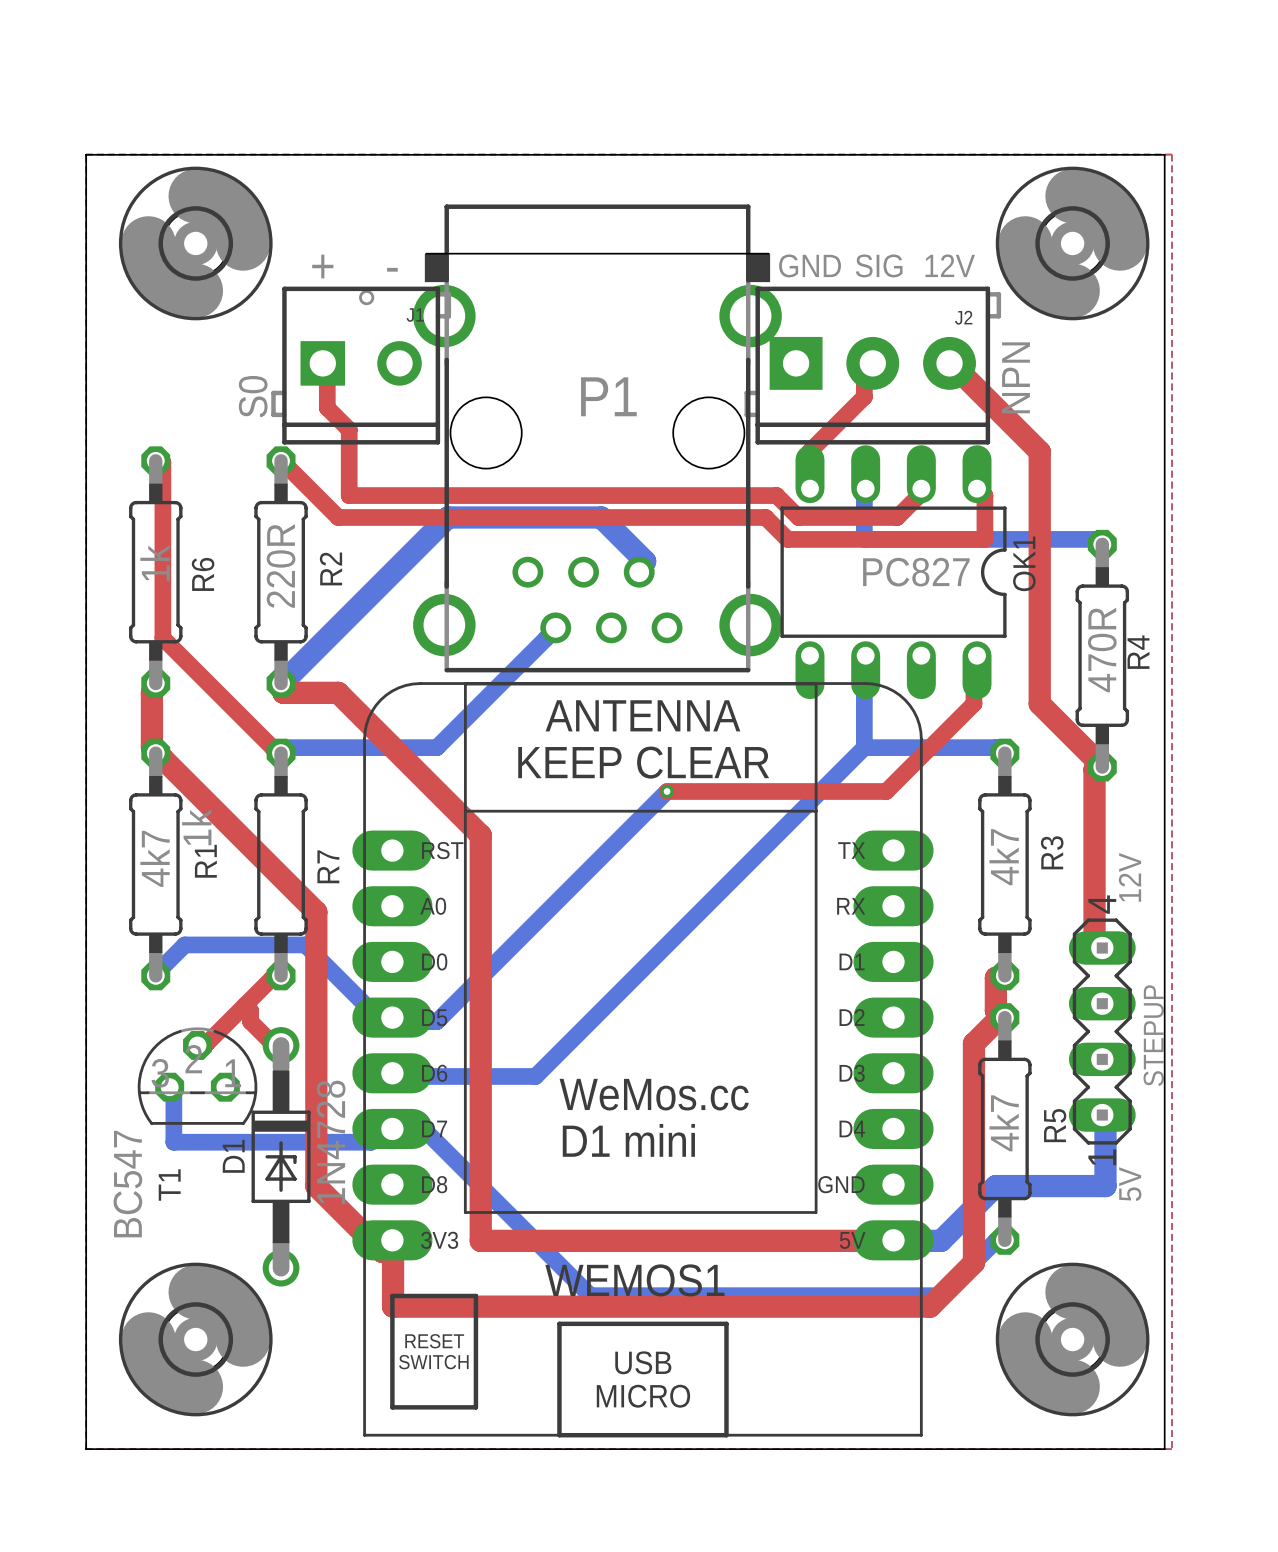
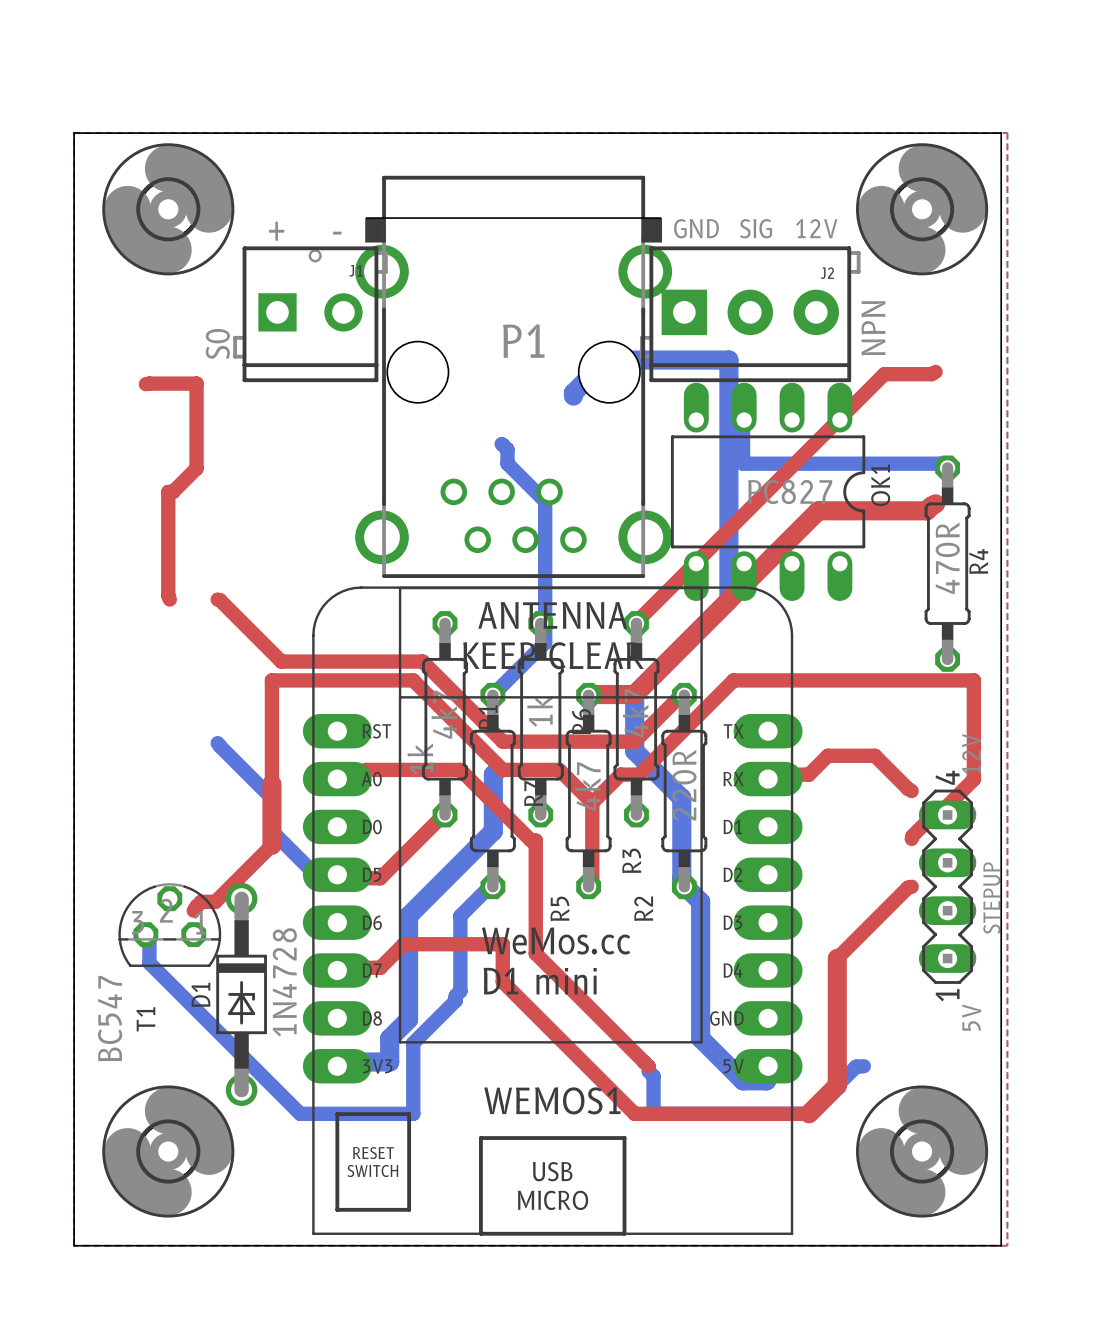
top track: (322, 363) (327, 364) (327, 407) (349, 429) (349, 495) (776, 495) (798, 517) (897, 517) (919, 495) (921, 488) -> none
top track: (872, 363) (864, 364) (864, 396) (809, 451) (809, 488) -> none
top track: (949, 363) (1039, 451) (1039, 703) (1102, 767) (1094, 769) (1094, 944) (1102, 948) -> none
top track: none -> (935, 371) (931, 374) (884, 374) (636, 623)
top track: none -> (145, 384) (196, 383) (196, 468) (173, 491) (168, 491) (169, 599)
top track: (155, 460) (162, 462) (162, 638) (272, 747) (281, 753) -> none
top track: (281, 460) (338, 517) (765, 517) (787, 539) (984, 539) (984, 495) (977, 488) -> none
bottom track: none -> (501, 444) (507, 449) (507, 463) (545, 501) (545, 619) (540, 623) (545, 623) (545, 642) (492, 695)
R2 name position: R2 (330, 568) -> R2 (643, 908)
R6 position: (155, 572) -> (540, 719)
R2 position: (281, 572) -> (684, 791)
bottom track: (639, 572) (645, 561) (601, 517) (447, 517) (281, 683) -> none
top track: none -> (935, 503) (926, 510) (818, 510) (634, 694) (588, 695)
bottom track: (555, 627) (436, 747) (283, 747) (281, 753) -> none
bottom track: (865, 655) (864, 747) -> none
top track: (977, 655) (973, 659) (973, 703) (886, 791) -> (911, 838) (931, 817) (936, 817) (973, 779) (973, 680) (761, 680)
top track: (155, 683) (151, 692) (151, 747) (155, 753) (316, 912) -> (592, 802) (559, 769) (502, 769) (413, 680) (271, 680) (271, 784)
top track: (281, 683) (283, 692) (338, 692) (480, 835) (480, 1240) (893, 1240) -> none
top track: none -> (217, 599) (281, 661) (422, 661) (502, 741) (634, 741) (677, 699) (681, 699) (684, 695)
bottom track: (864, 747) (995, 747) (1004, 753) -> none
bottom track: (864, 747) (535, 1076) (393, 1076) (392, 1073) -> none
top track: (667, 791) (853, 791) -> (592, 802) (620, 774) (639, 774) (733, 680)
bottom track: (667, 791) (436, 1021) (393, 1021) (392, 1017) (382, 1010) (371, 1010) (305, 944) (184, 944) (155, 975) -> none
via: (667, 791) -> none
R3 name position: R3 (1052, 852) -> R3 (631, 860)
R1 position: (155, 864) -> (445, 719)
bottom track: none -> (217, 743) (271, 798) (271, 831) (314, 873) (337, 874)
R7 position: (281, 864) -> (492, 791)
R3 position: (1004, 864) -> (636, 719)
bottom track: none -> (498, 769) (493, 774) (493, 831) (408, 915) (408, 1019) (389, 1038) (389, 1062) (337, 1062) (337, 1066)
top track: none -> (337, 779) (356, 779) (366, 769) (460, 769) (531, 840) (535, 840) (535, 953) (648, 1066)
top track: none -> (768, 779) (771, 774) (809, 774) (827, 755) (874, 755) (911, 791)
top track: none -> (592, 802) (592, 882) (588, 886)
top track: none -> (445, 814) (380, 878) (337, 878) (337, 874)
top track: (281, 975) (272, 977) (206, 1043) (197, 1045) -> none
top track: (1004, 975) (995, 977) (995, 1010) (1004, 1017) (995, 1021) (973, 1043) (973, 1114) -> (911, 886) (907, 887) (837, 958)
top track: (316, 983) (316, 1186) (382, 1251) (393, 1240) (393, 1306) (930, 1306) (941, 1295) -> (337, 970) (337, 967) (380, 967) (403, 944) (502, 944) (502, 981) (634, 1113) (809, 1113)
top track: none -> (271, 845) (215, 901) (201, 901) (193, 910)
top track: (245, 1005) (250, 1010) (250, 1021) (272, 1043) (281, 1045) -> none
bottom track: (1102, 1115) (1105, 1120) (1105, 1186) (995, 1186) (941, 1240) (893, 1240) -> (573, 396) (573, 393) (606, 360) (728, 360) (728, 600) (634, 694) (634, 751) (681, 798) (681, 878) (684, 886) (700, 901) (700, 1038) (743, 1080) (766, 1080) (768, 1066)
bottom track: (173, 1120) (173, 1142) (371, 1142) (382, 1131) (392, 1128) (393, 1131) (425, 1131) (590, 1295) (760, 1295) -> (149, 963) (300, 1113) (413, 1113) (413, 1043) (455, 1000) (455, 996) (460, 991) (460, 915) (488, 887) (492, 886)
R5 name position: R5 (1055, 1125) -> R5 (559, 908)
R5 position: (1004, 1128) -> (588, 791)
bottom track: none -> (648, 1066) (648, 1071) (653, 1076) (653, 1113)

